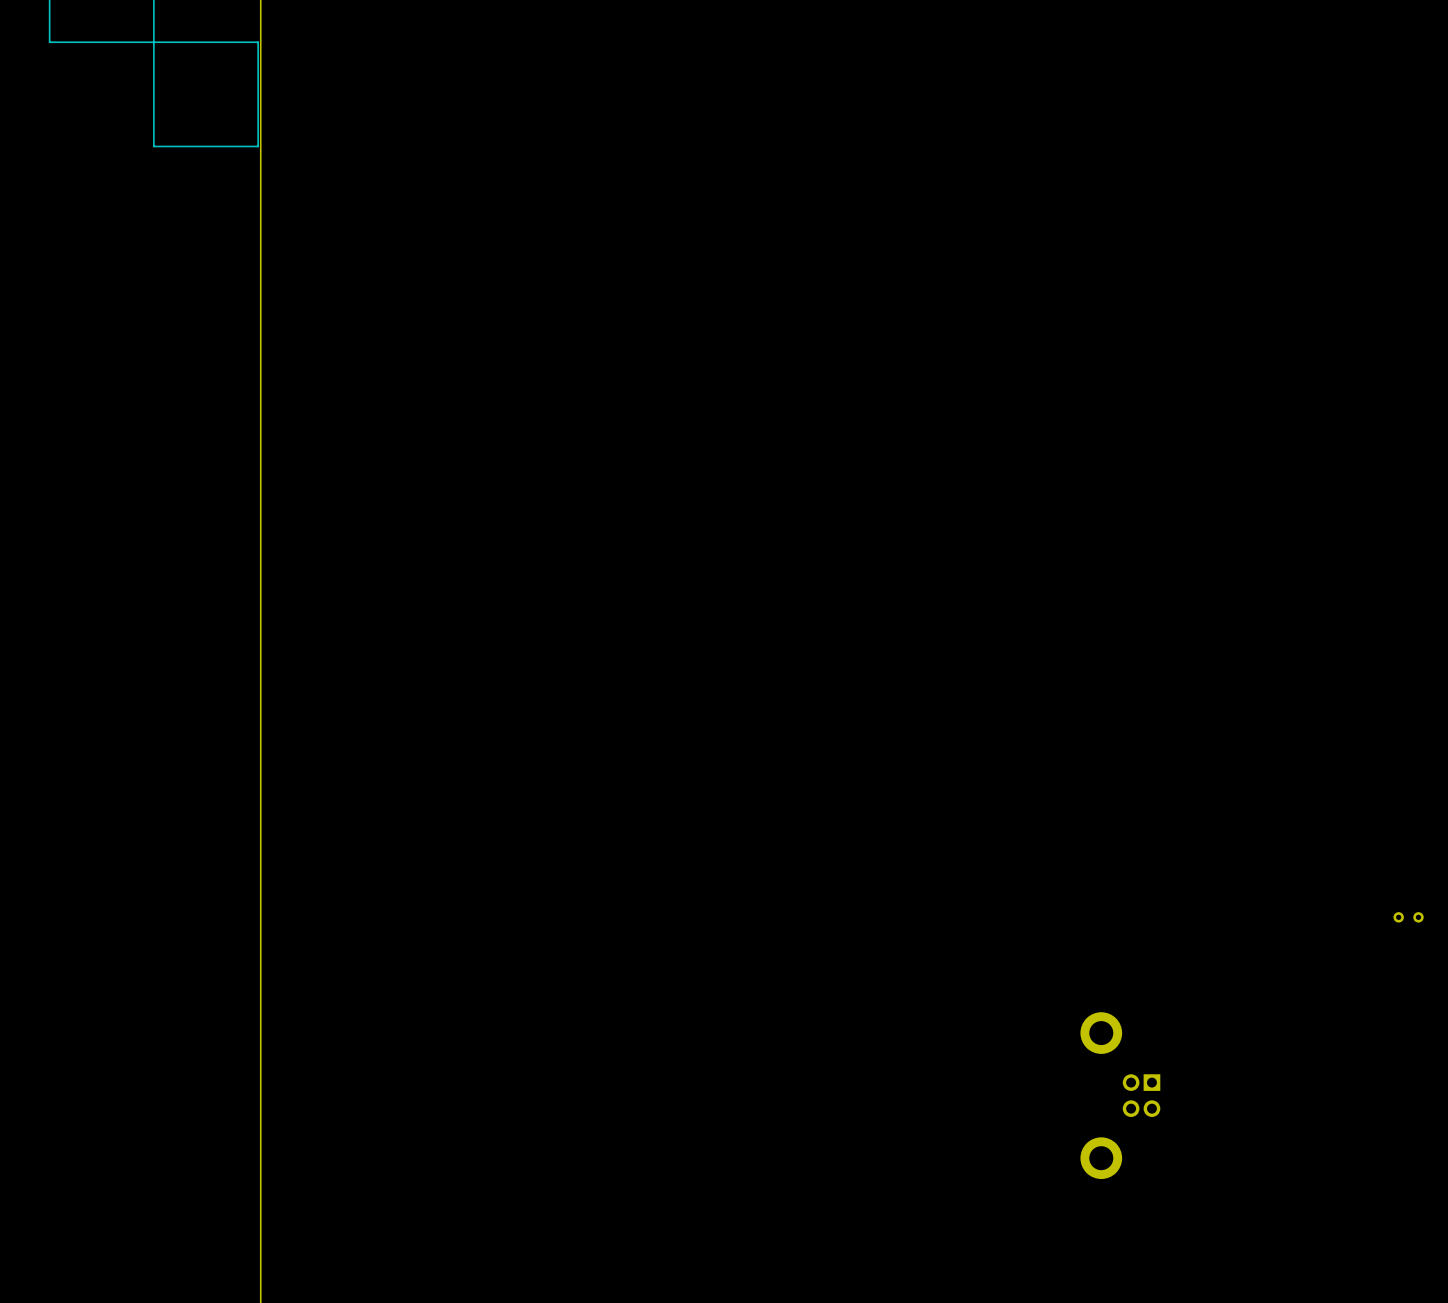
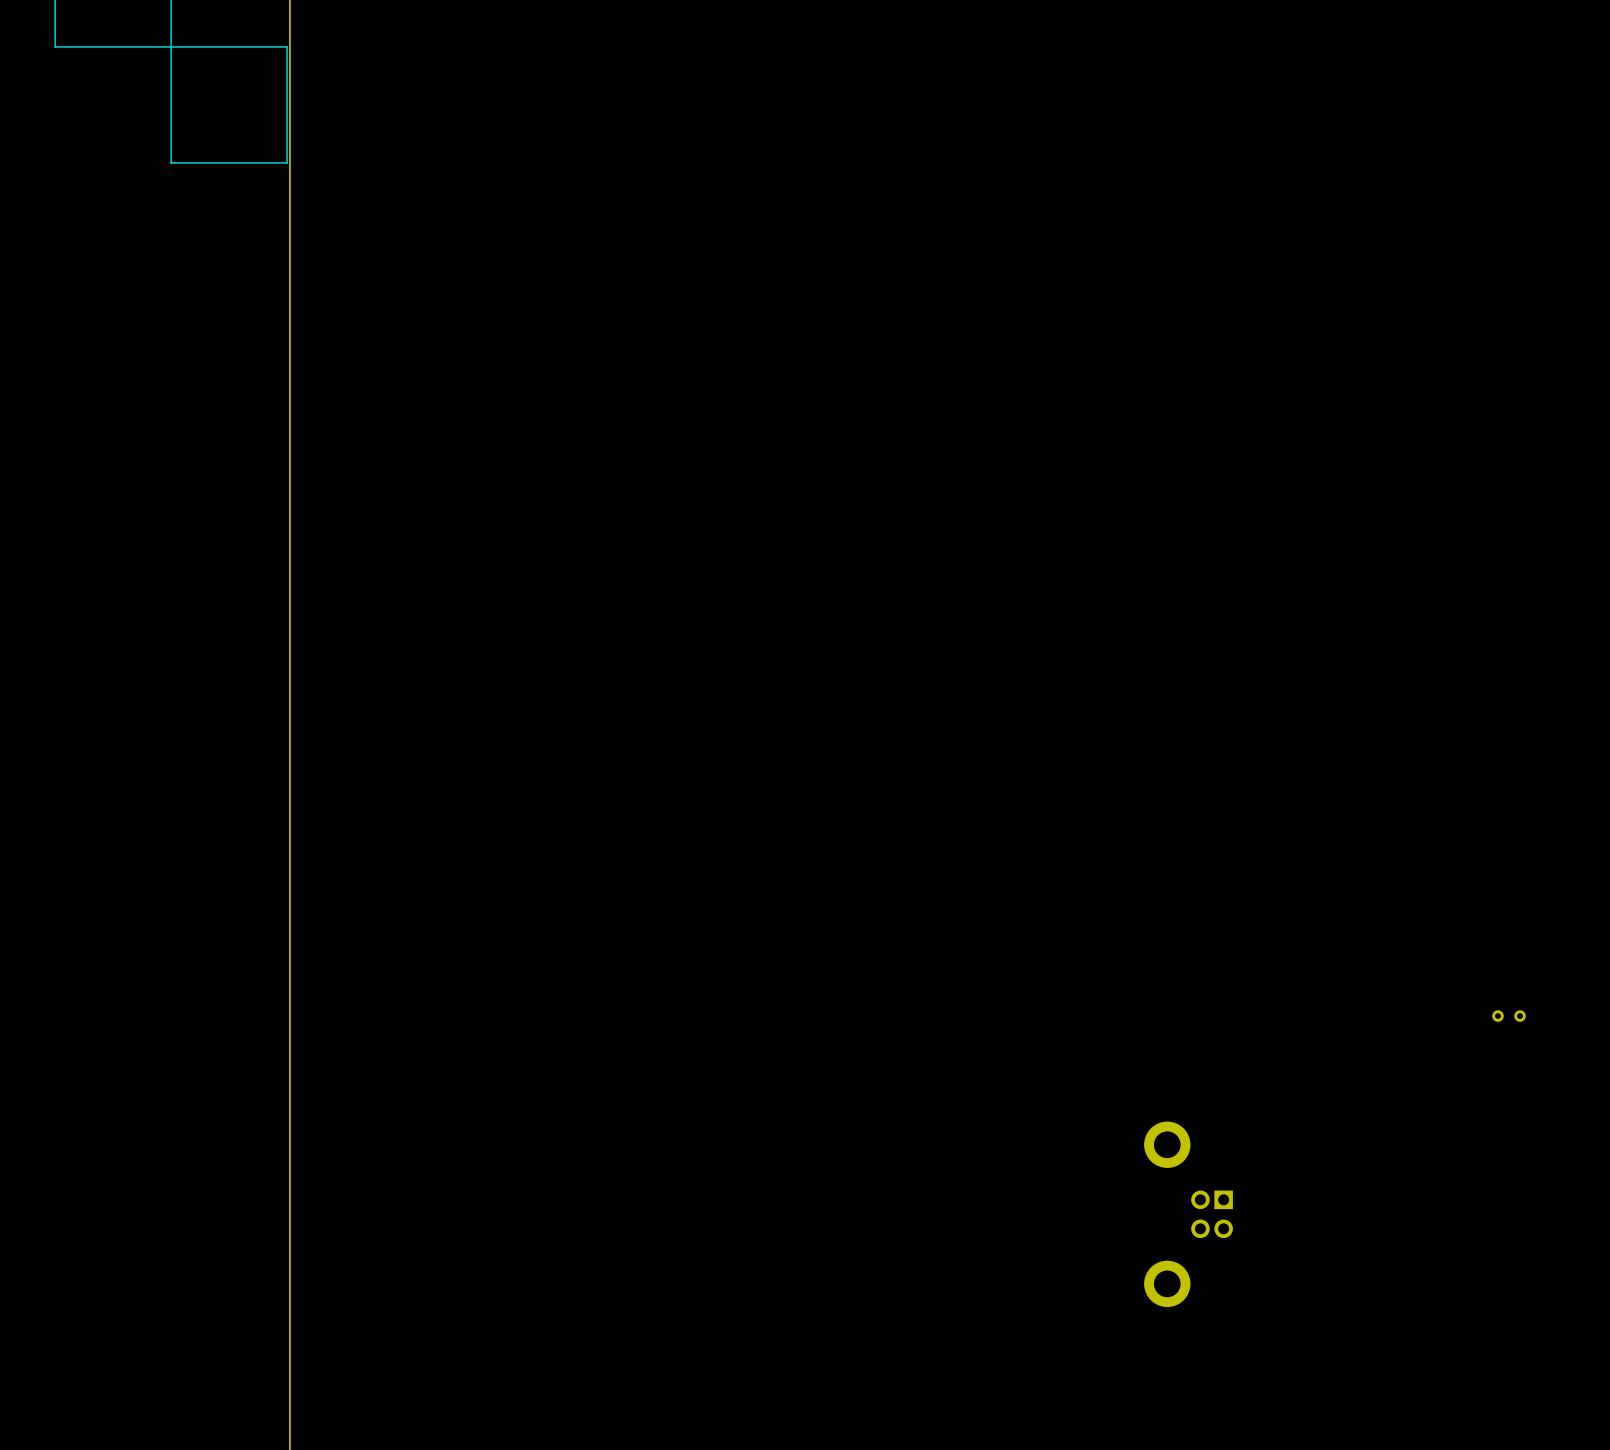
part position: (1408, 917) -> (1509, 1016)
part position: (1120, 1095) -> (1188, 1214)

